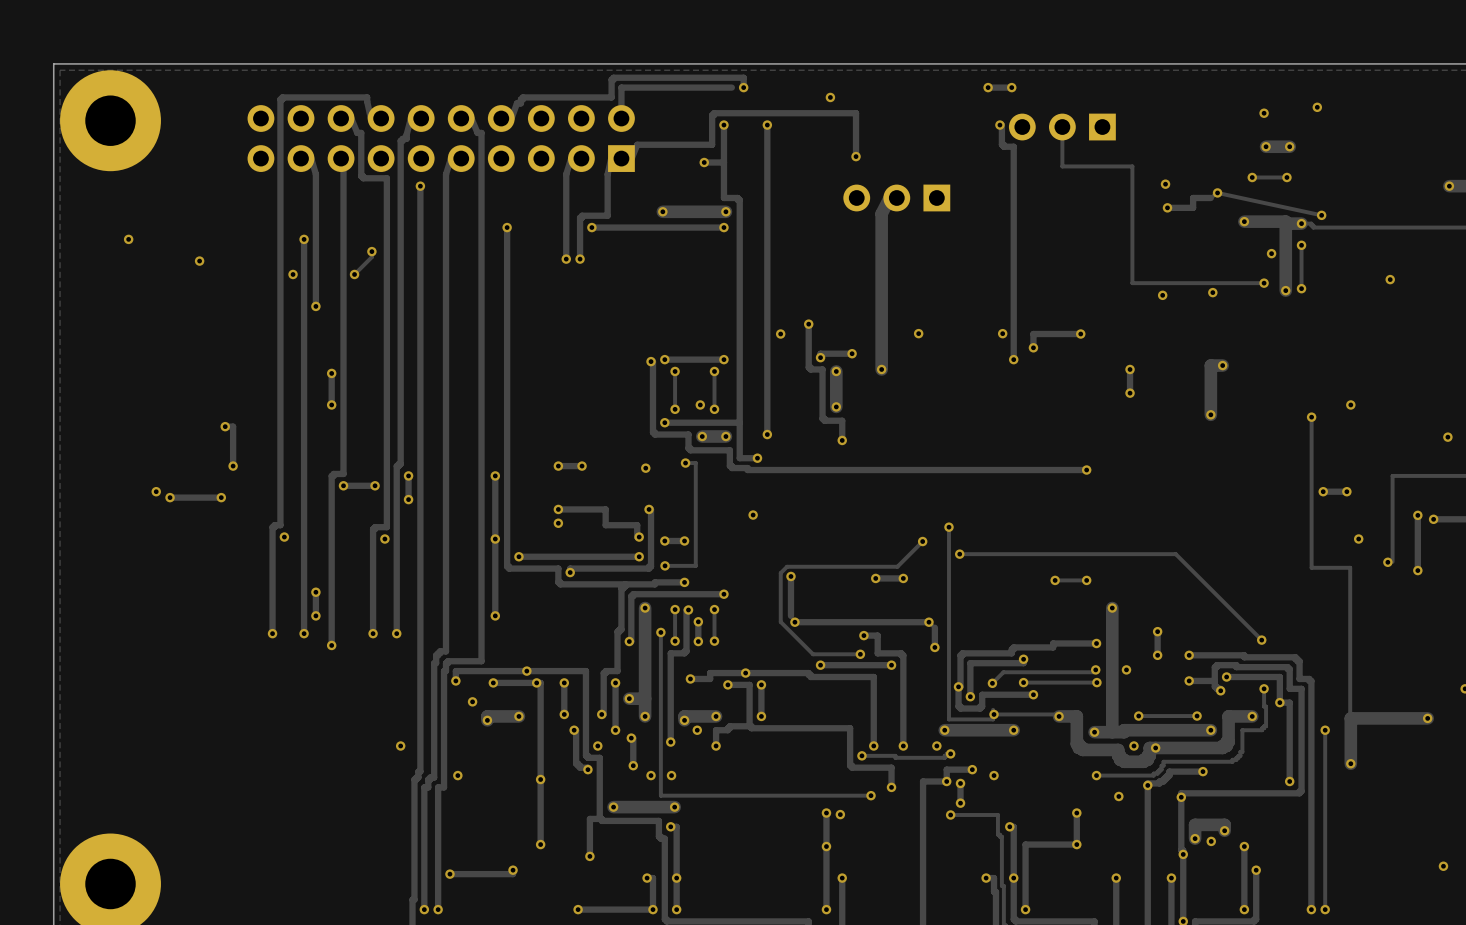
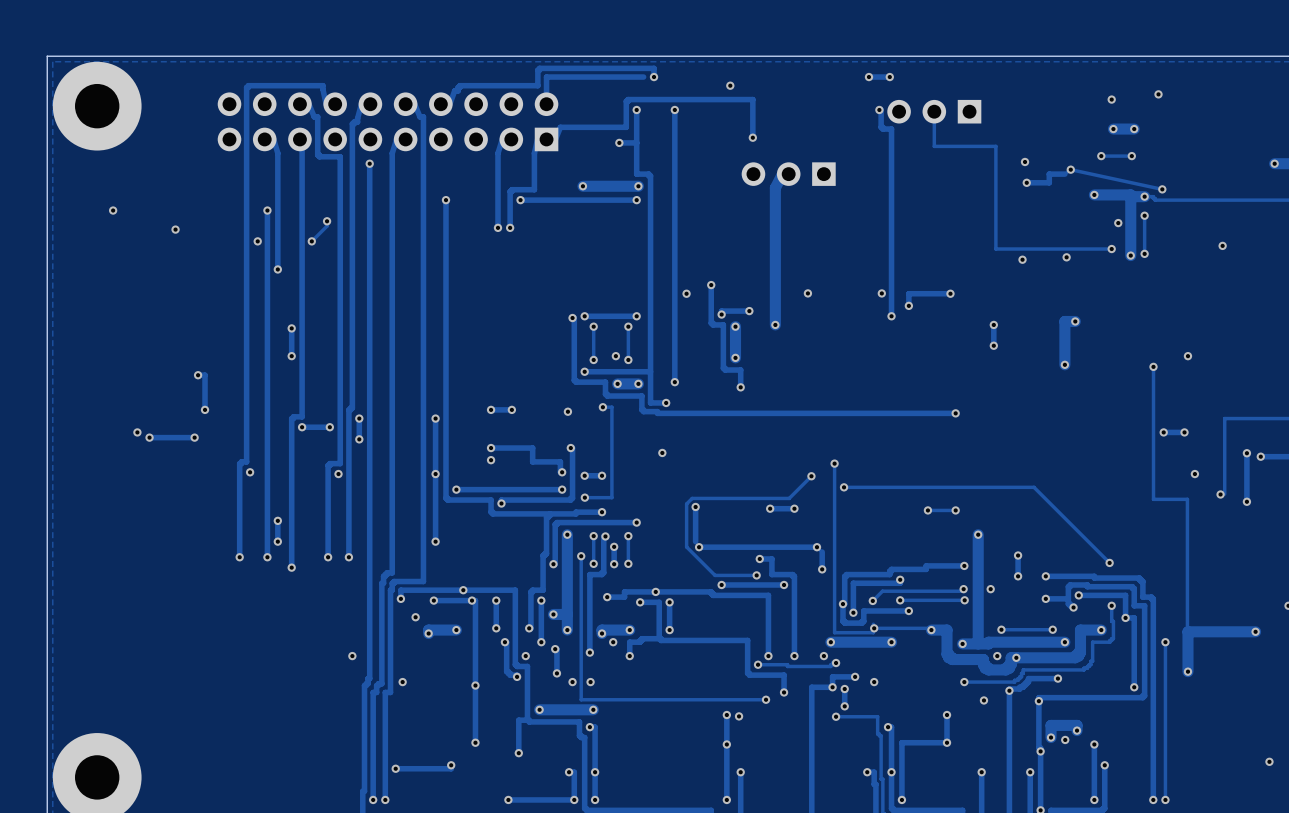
via: (1447, 437) -> none

